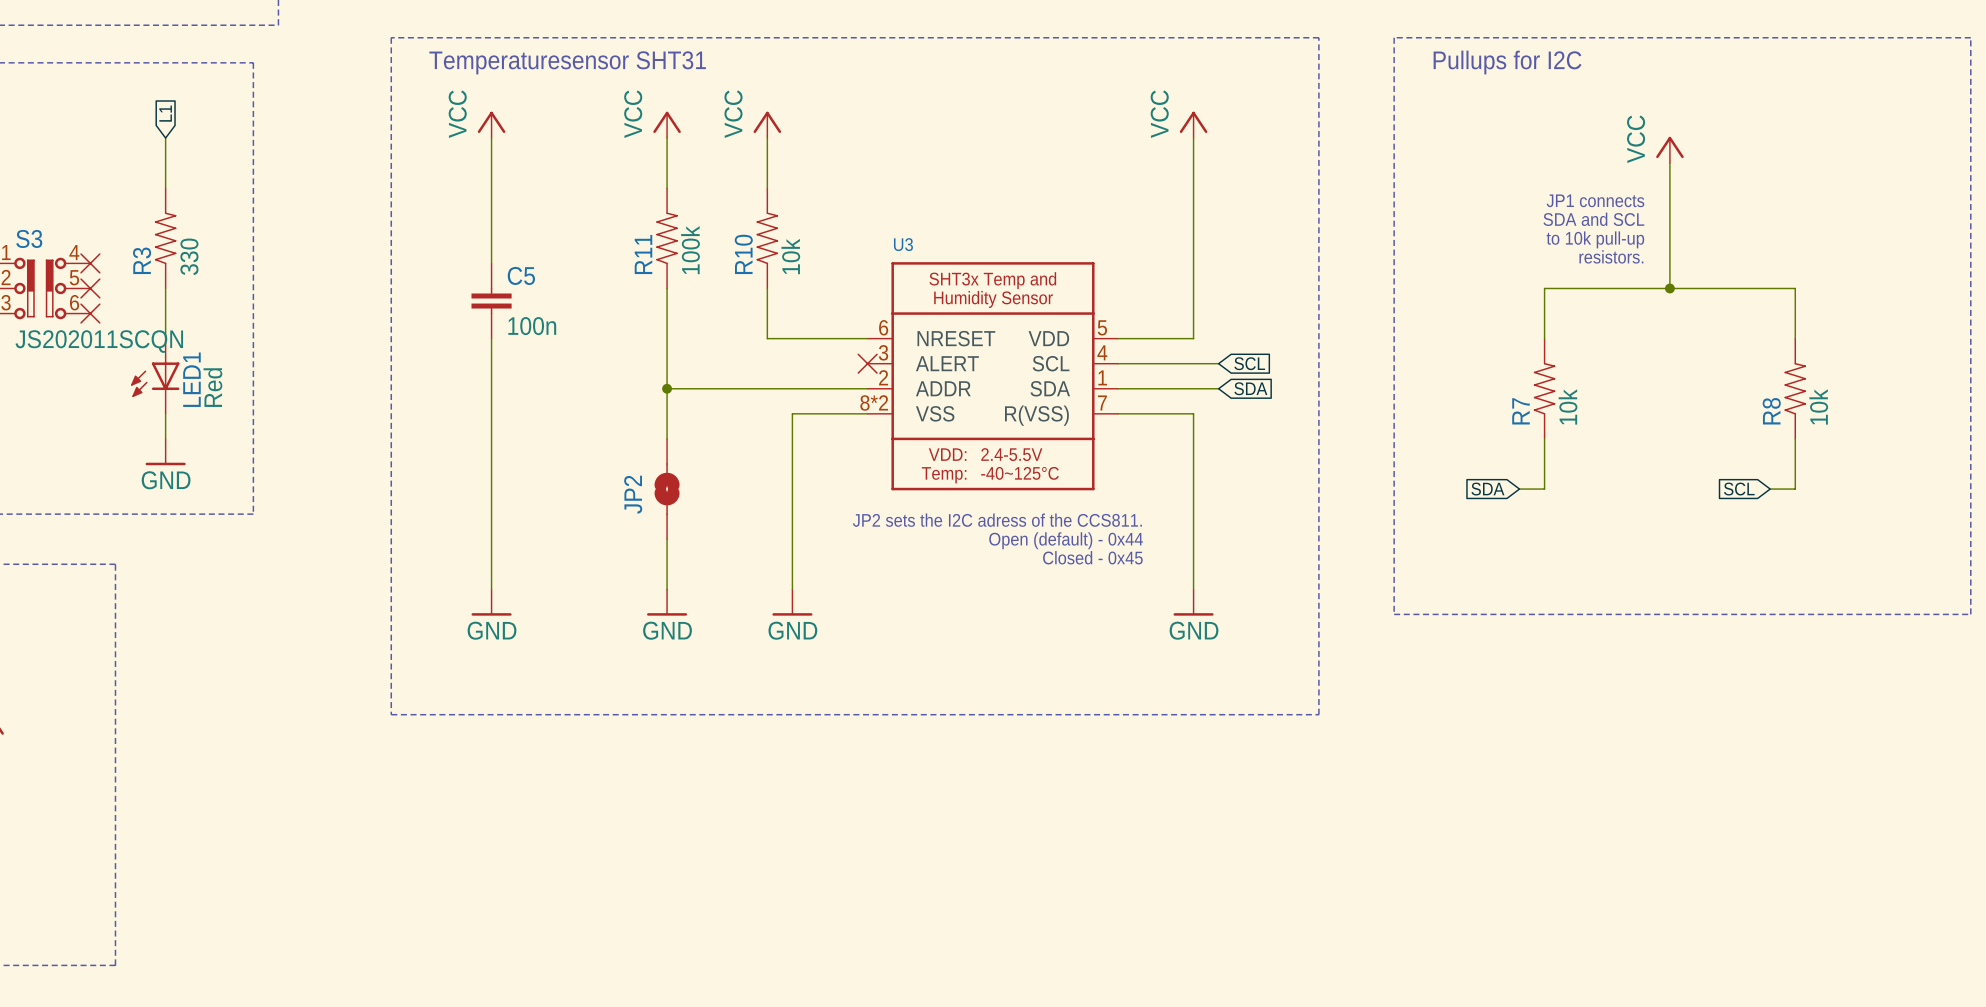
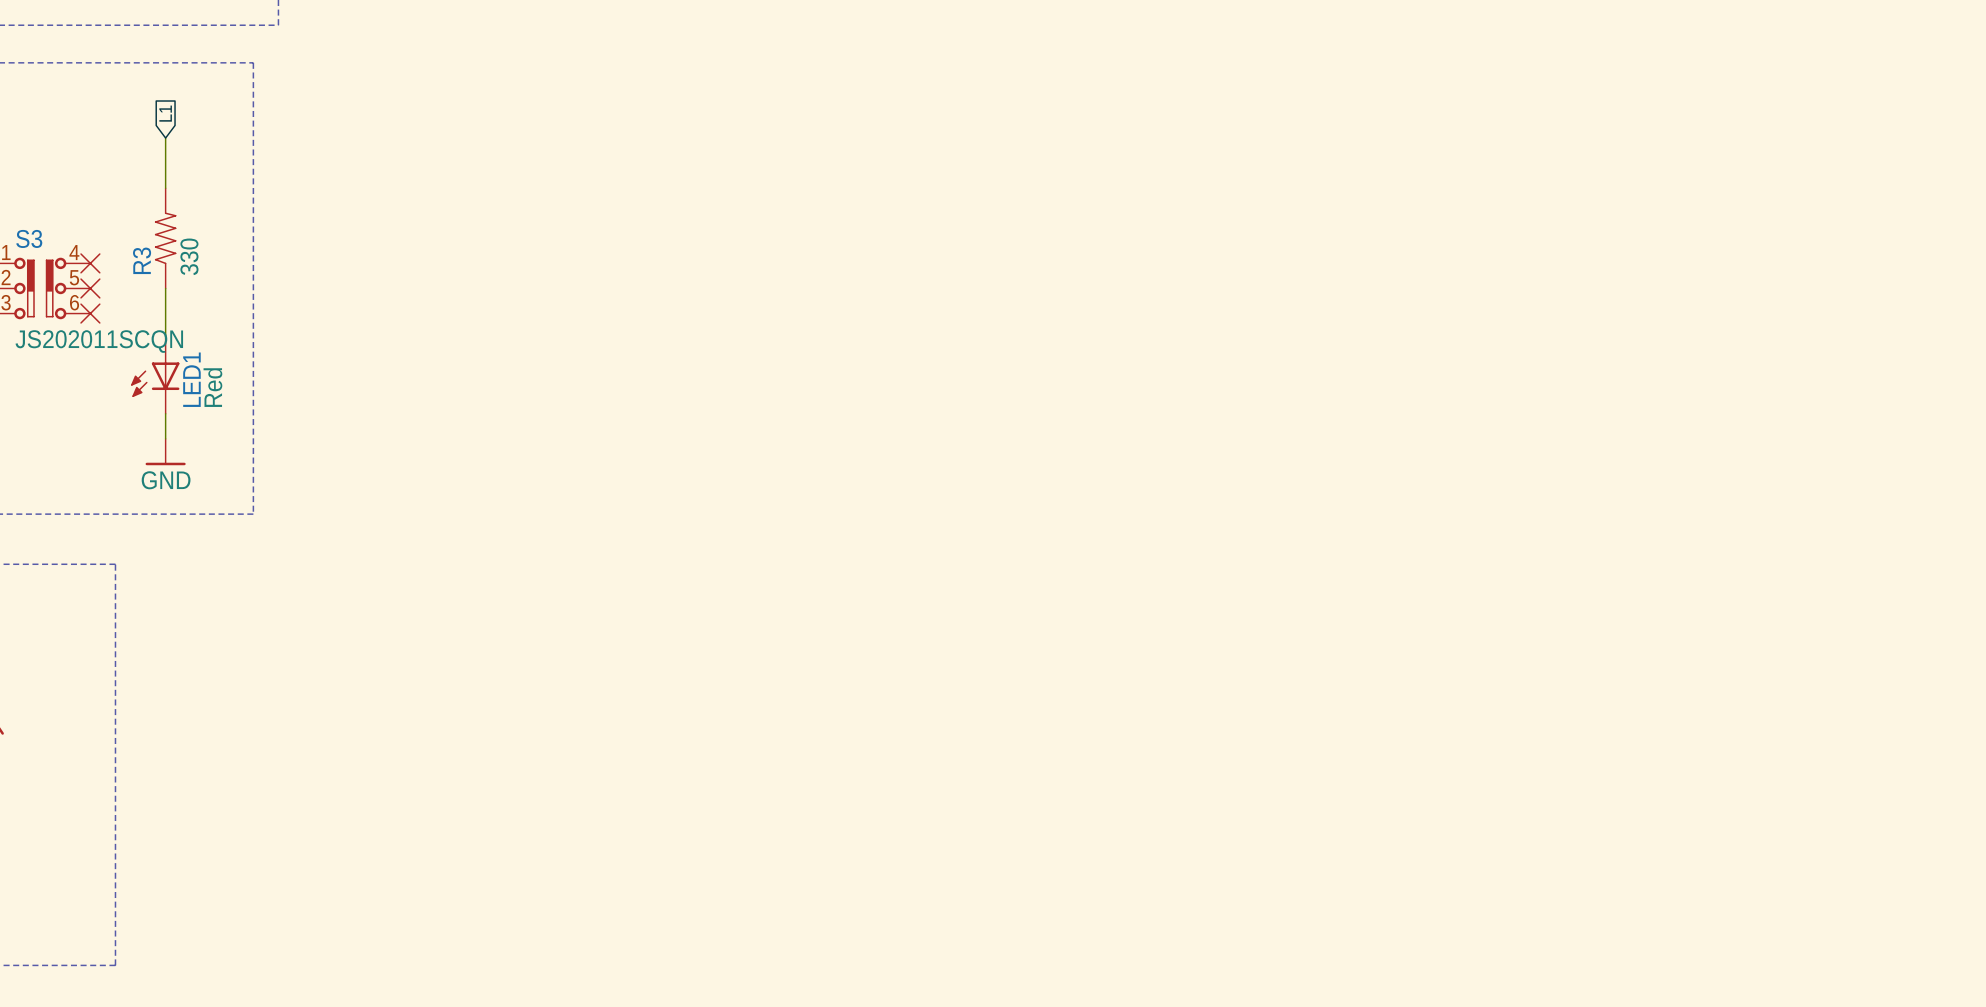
line: (391, 37) (391, 714) (1318, 714) (1318, 37) (391, 37) -> none
line: (1394, 37) (1970, 37) (1970, 614) (1394, 614) (1394, 37) -> none
text: Temperaturesensor SHT31 (567, 62) -> none
text: Pullups for I2C (1507, 62) -> none
power symbol: VCC (491, 124) -> none
power symbol: VCC (667, 124) -> none
power symbol: VCC (767, 124) -> none
power symbol: VCC (1193, 124) -> none
wire: (491, 138) (491, 263) -> none
wire: (667, 138) (667, 188) -> none
wire: (767, 138) (767, 188) -> none
wire: (1193, 138) (1193, 338) (1118, 338) -> none
power symbol: VCC (1669, 149) -> none
wire: (1669, 163) (1669, 288) -> none
text: JP1 connects (1595, 200) -> none
text: SDA and SCL (1593, 219) -> none
R11: 100k (667, 238) -> none
R10: 10k (767, 238) -> none
text: to 10k pull-up (1595, 239) -> none
text: resistors. (1611, 256) -> none
wire: (667, 288) (667, 438) -> none
wire: (767, 288) (767, 338) (867, 338) -> none
junction: (1669, 288) -> none
C5: 100n (491, 301) -> none
wire: (491, 338) (491, 589) -> none
wire: (1544, 338) (1544, 288) (1795, 288) (1795, 338) -> none
part: (867, 363) -> none
wire: (1118, 363) (1218, 363) -> none
global label: SCL (1249, 363) -> none
U3: (992, 376) -> none
wire: (667, 388) (867, 388) -> none
junction: (667, 388) -> none
wire: (1118, 388) (1218, 388) -> none
global label: SDA (1250, 388) -> none
R7: 10k (1544, 388) -> none
R8: 10k (1795, 388) -> none
wire: (867, 413) (792, 413) (792, 589) -> none
wire: (1118, 413) (1193, 413) (1193, 589) -> none
wire: (1544, 438) (1544, 489) (1519, 489) -> none
wire: (1795, 438) (1795, 489) (1770, 489) -> none
JP2: (667, 489) -> none
global label: SDA (1487, 489) -> none
global label: SCL (1739, 489) -> none
text: JP2 sets the I2C adress of the CCS811. (997, 520) -> none
wire: (667, 539) (667, 589) -> none
text: Open (default) - 0x44 (1066, 540) -> none
text: Closed - 0x45 (1092, 557) -> none
power symbol: GND (491, 602) -> none
power symbol: GND (667, 602) -> none
power symbol: GND (792, 602) -> none
power symbol: GND (1193, 602) -> none

